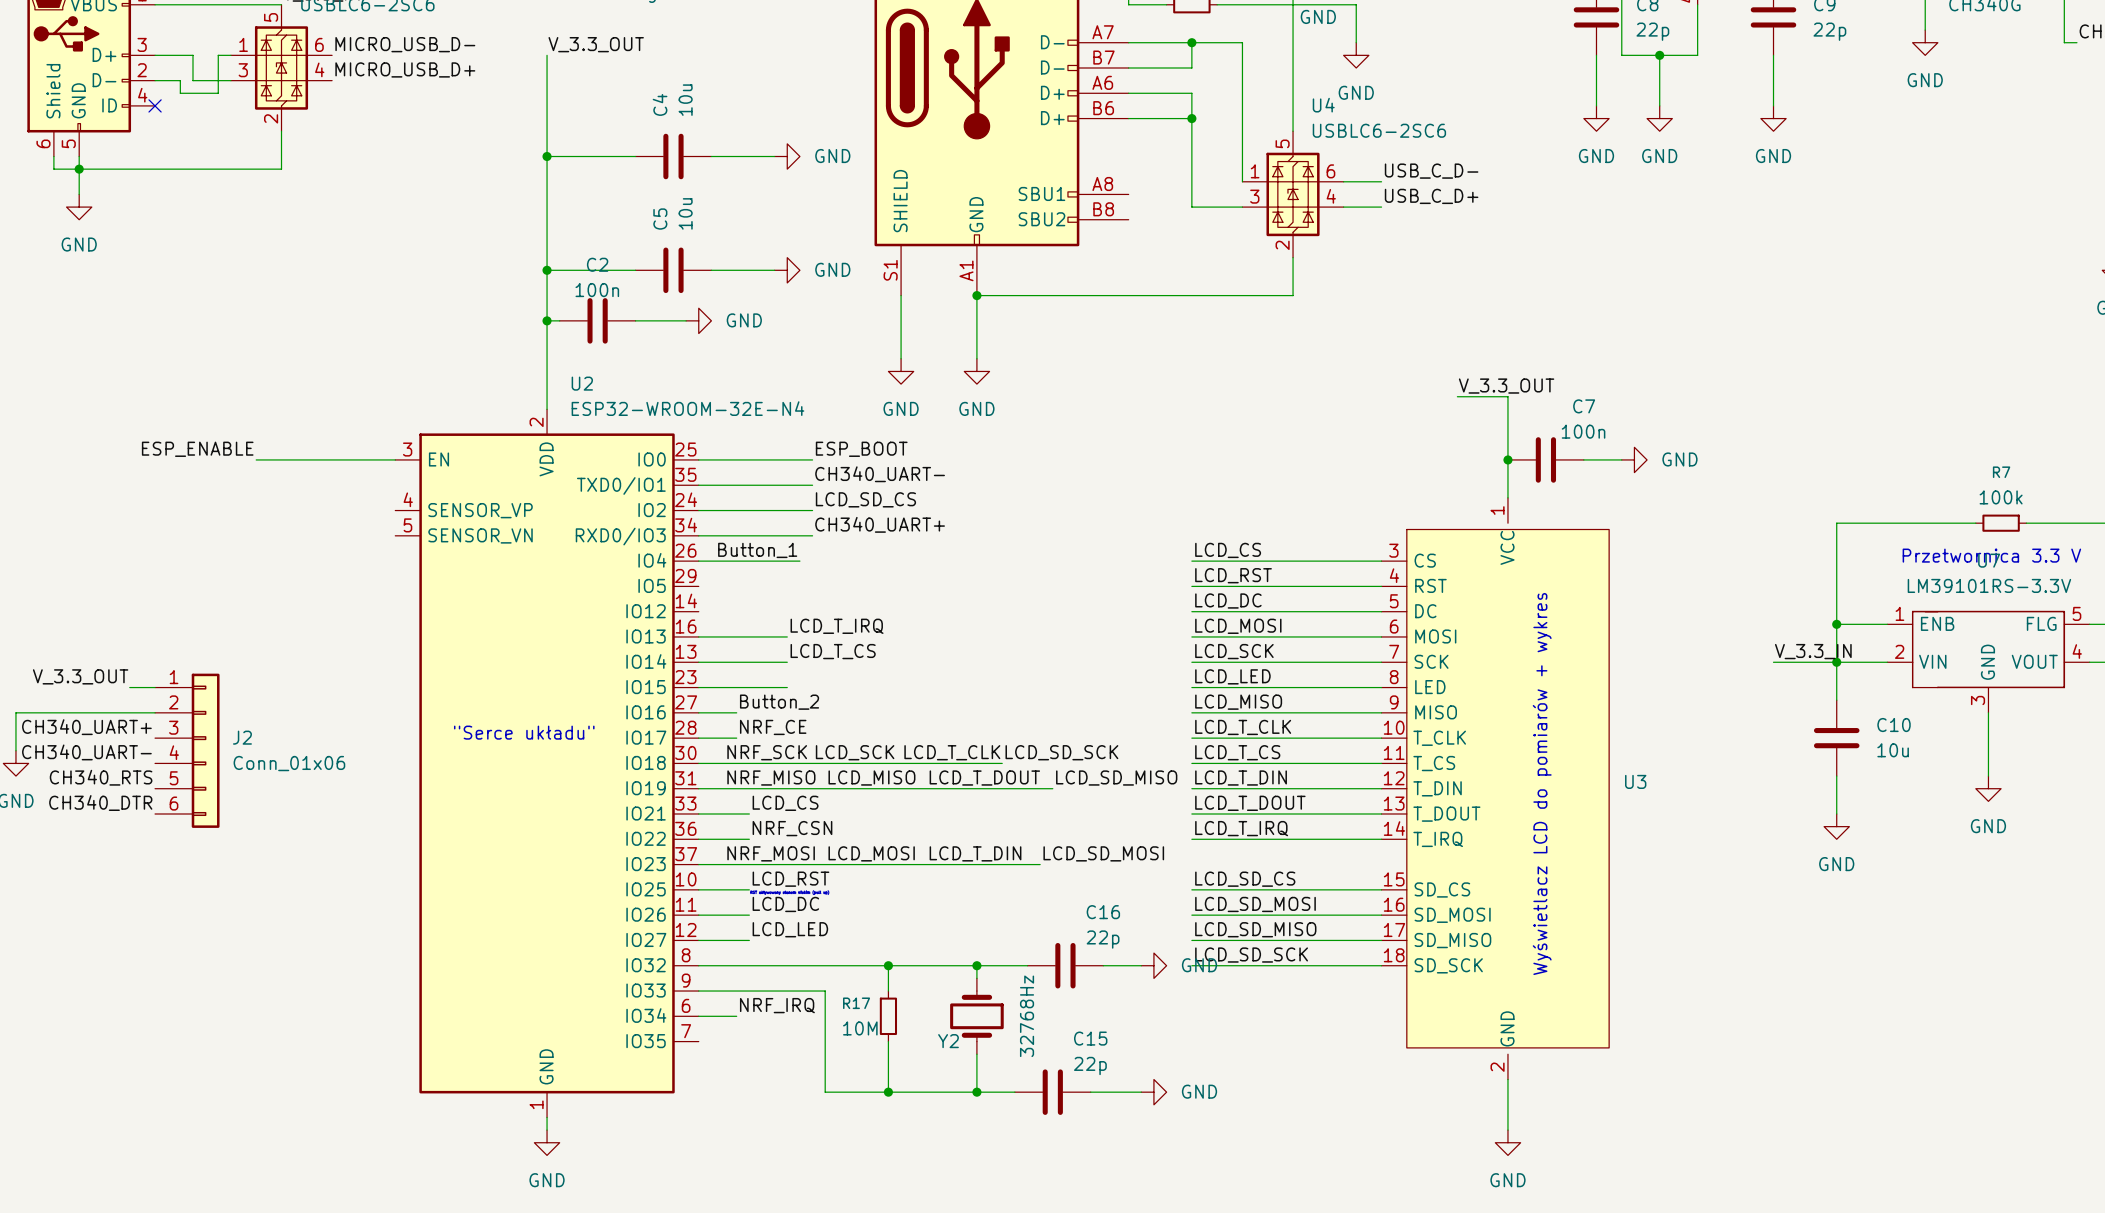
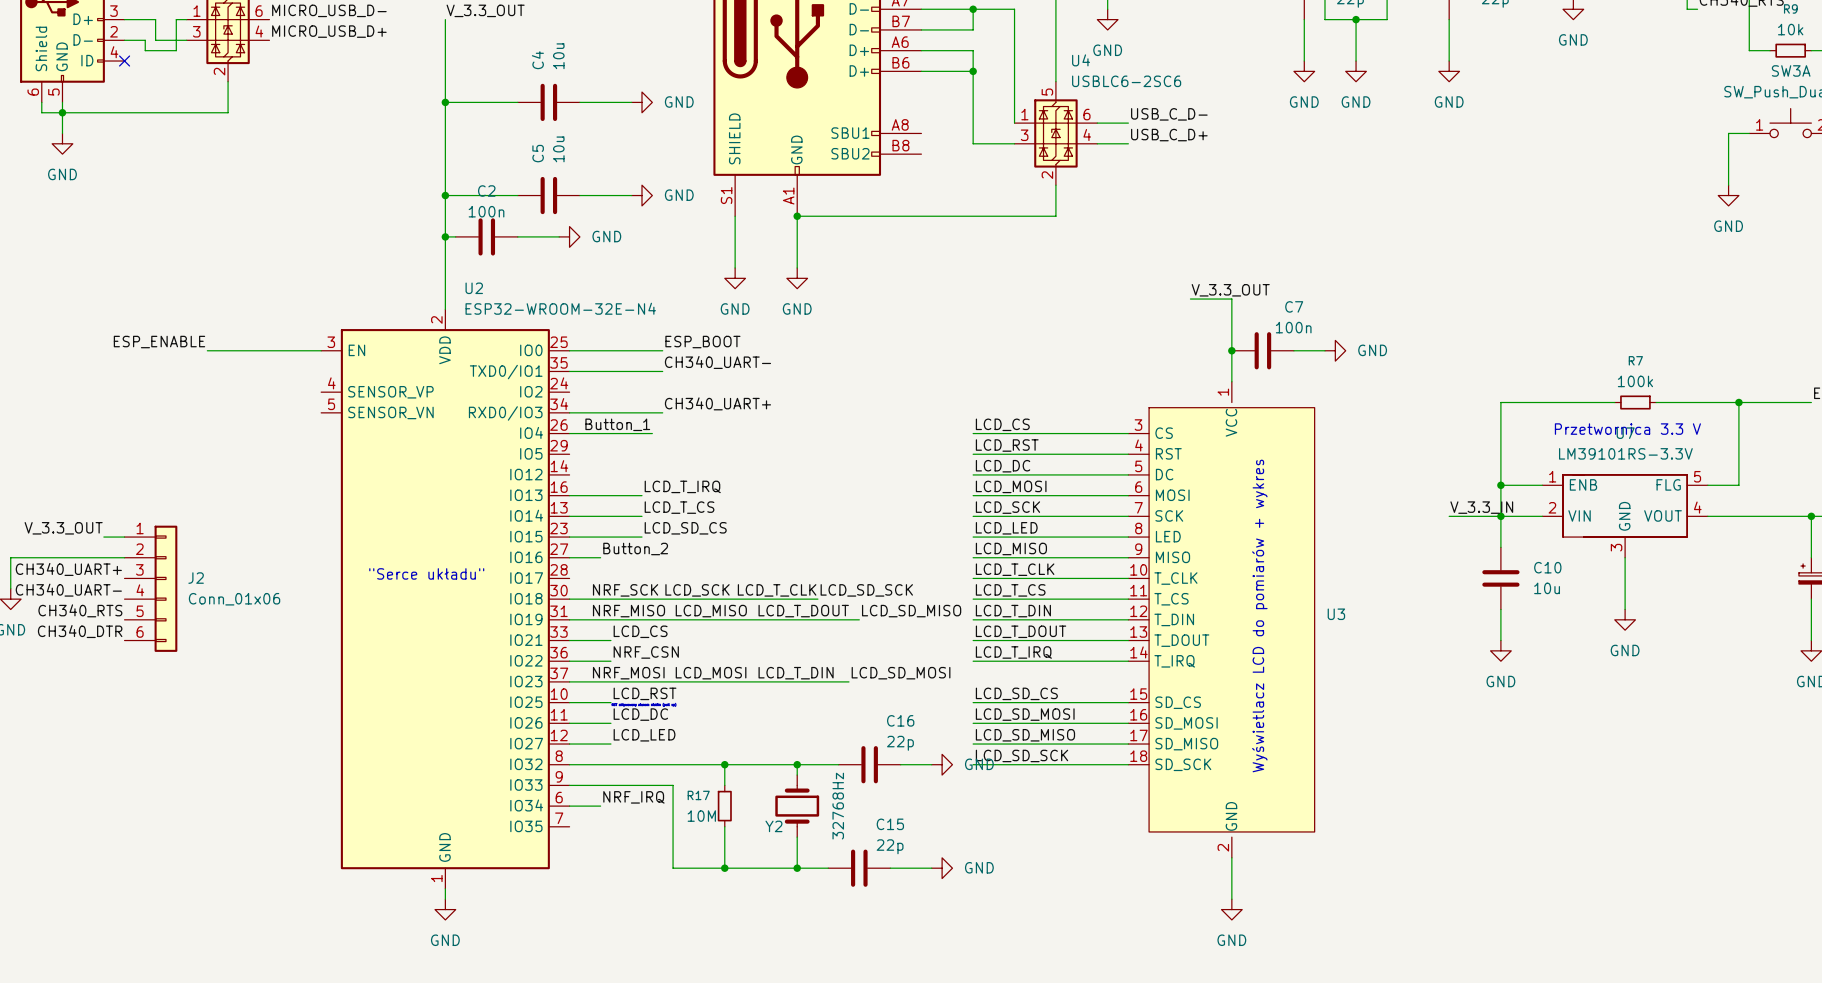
label position: LCD_SD_CS (865, 499) -> LCD_SD_CS (685, 528)
wire: (698, 510) (812, 510) -> none
label: NRF_CE (773, 727) -> none
wire: (698, 738) (736, 738) -> none

